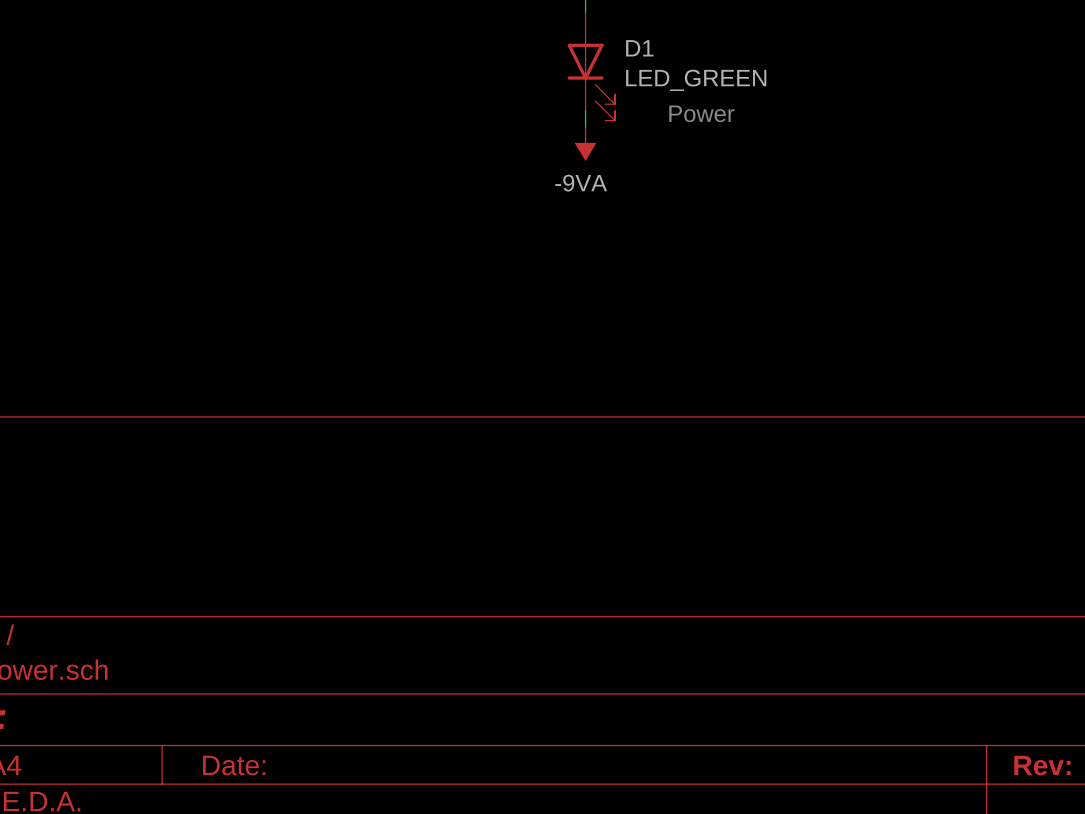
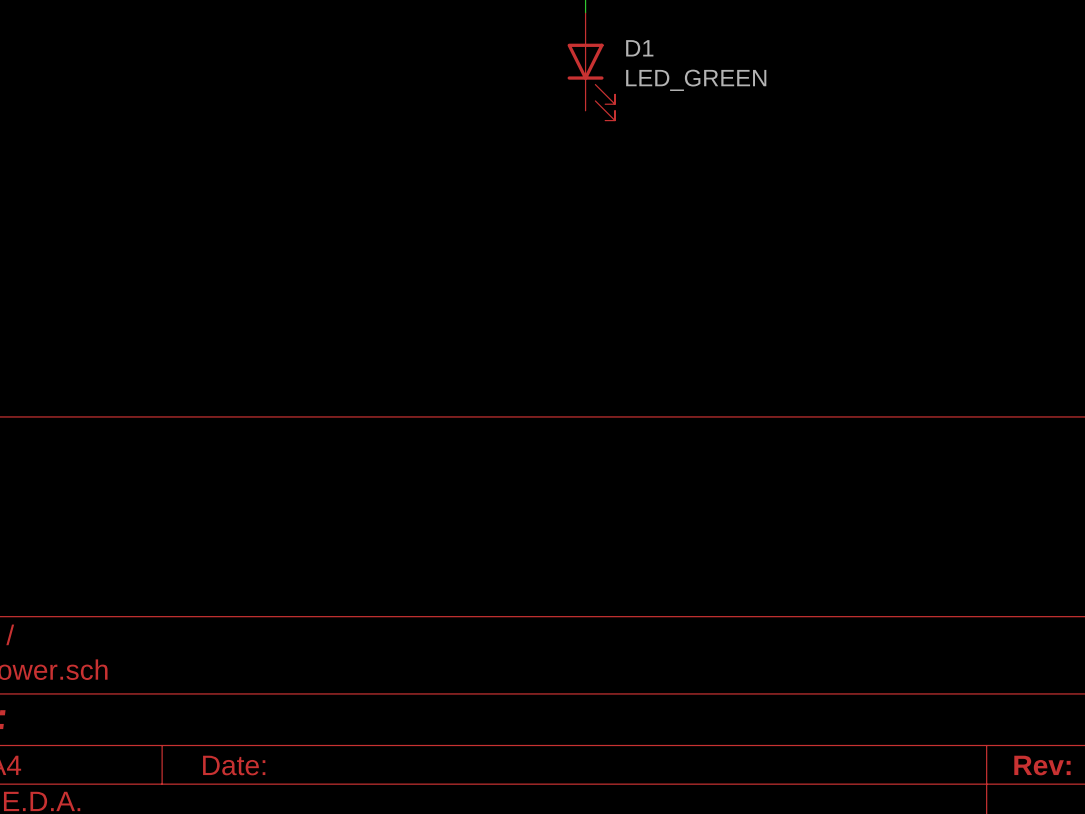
wire: (585, 110) (585, 127) -> none
text: Power (701, 113) -> none
power symbol: -9VA (585, 143) -> none

